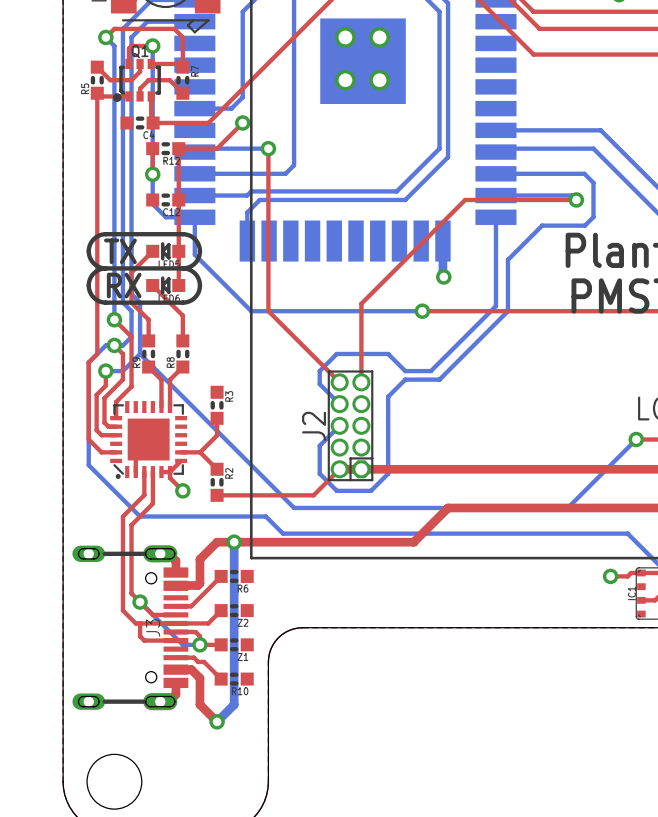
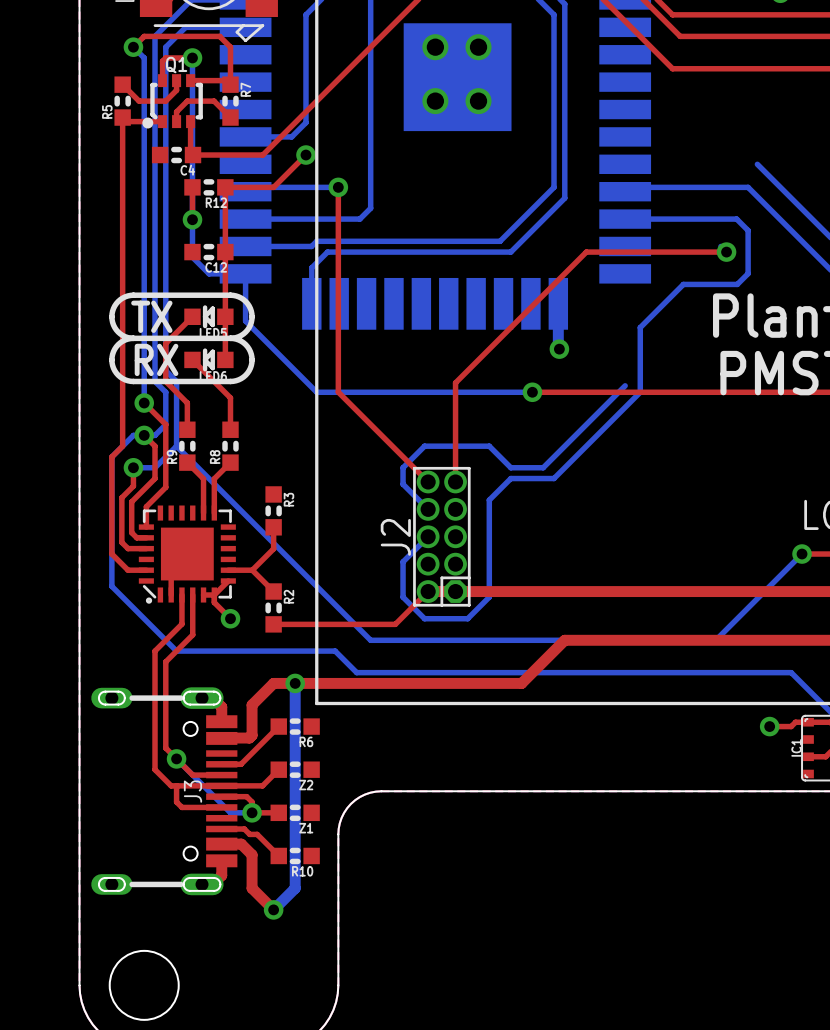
bottom track: (495, 130) (600, 130) -> none
bottom track: (495, 195) (571, 195) -> none
bottom track: (495, 217) (495, 306) -> none

